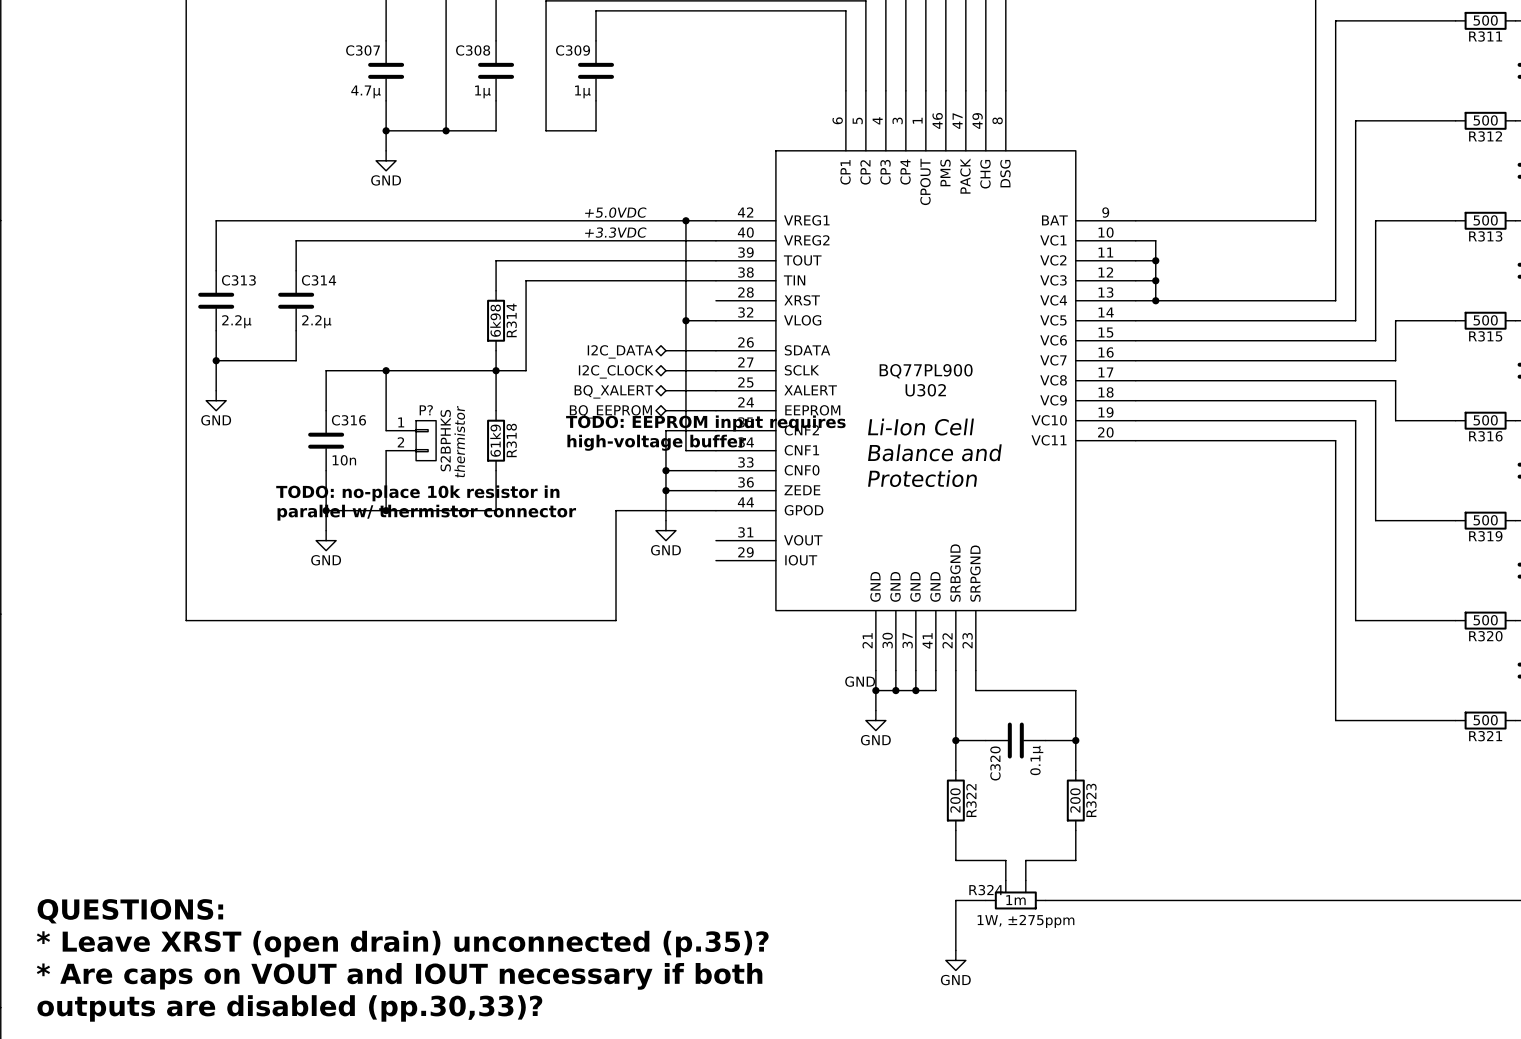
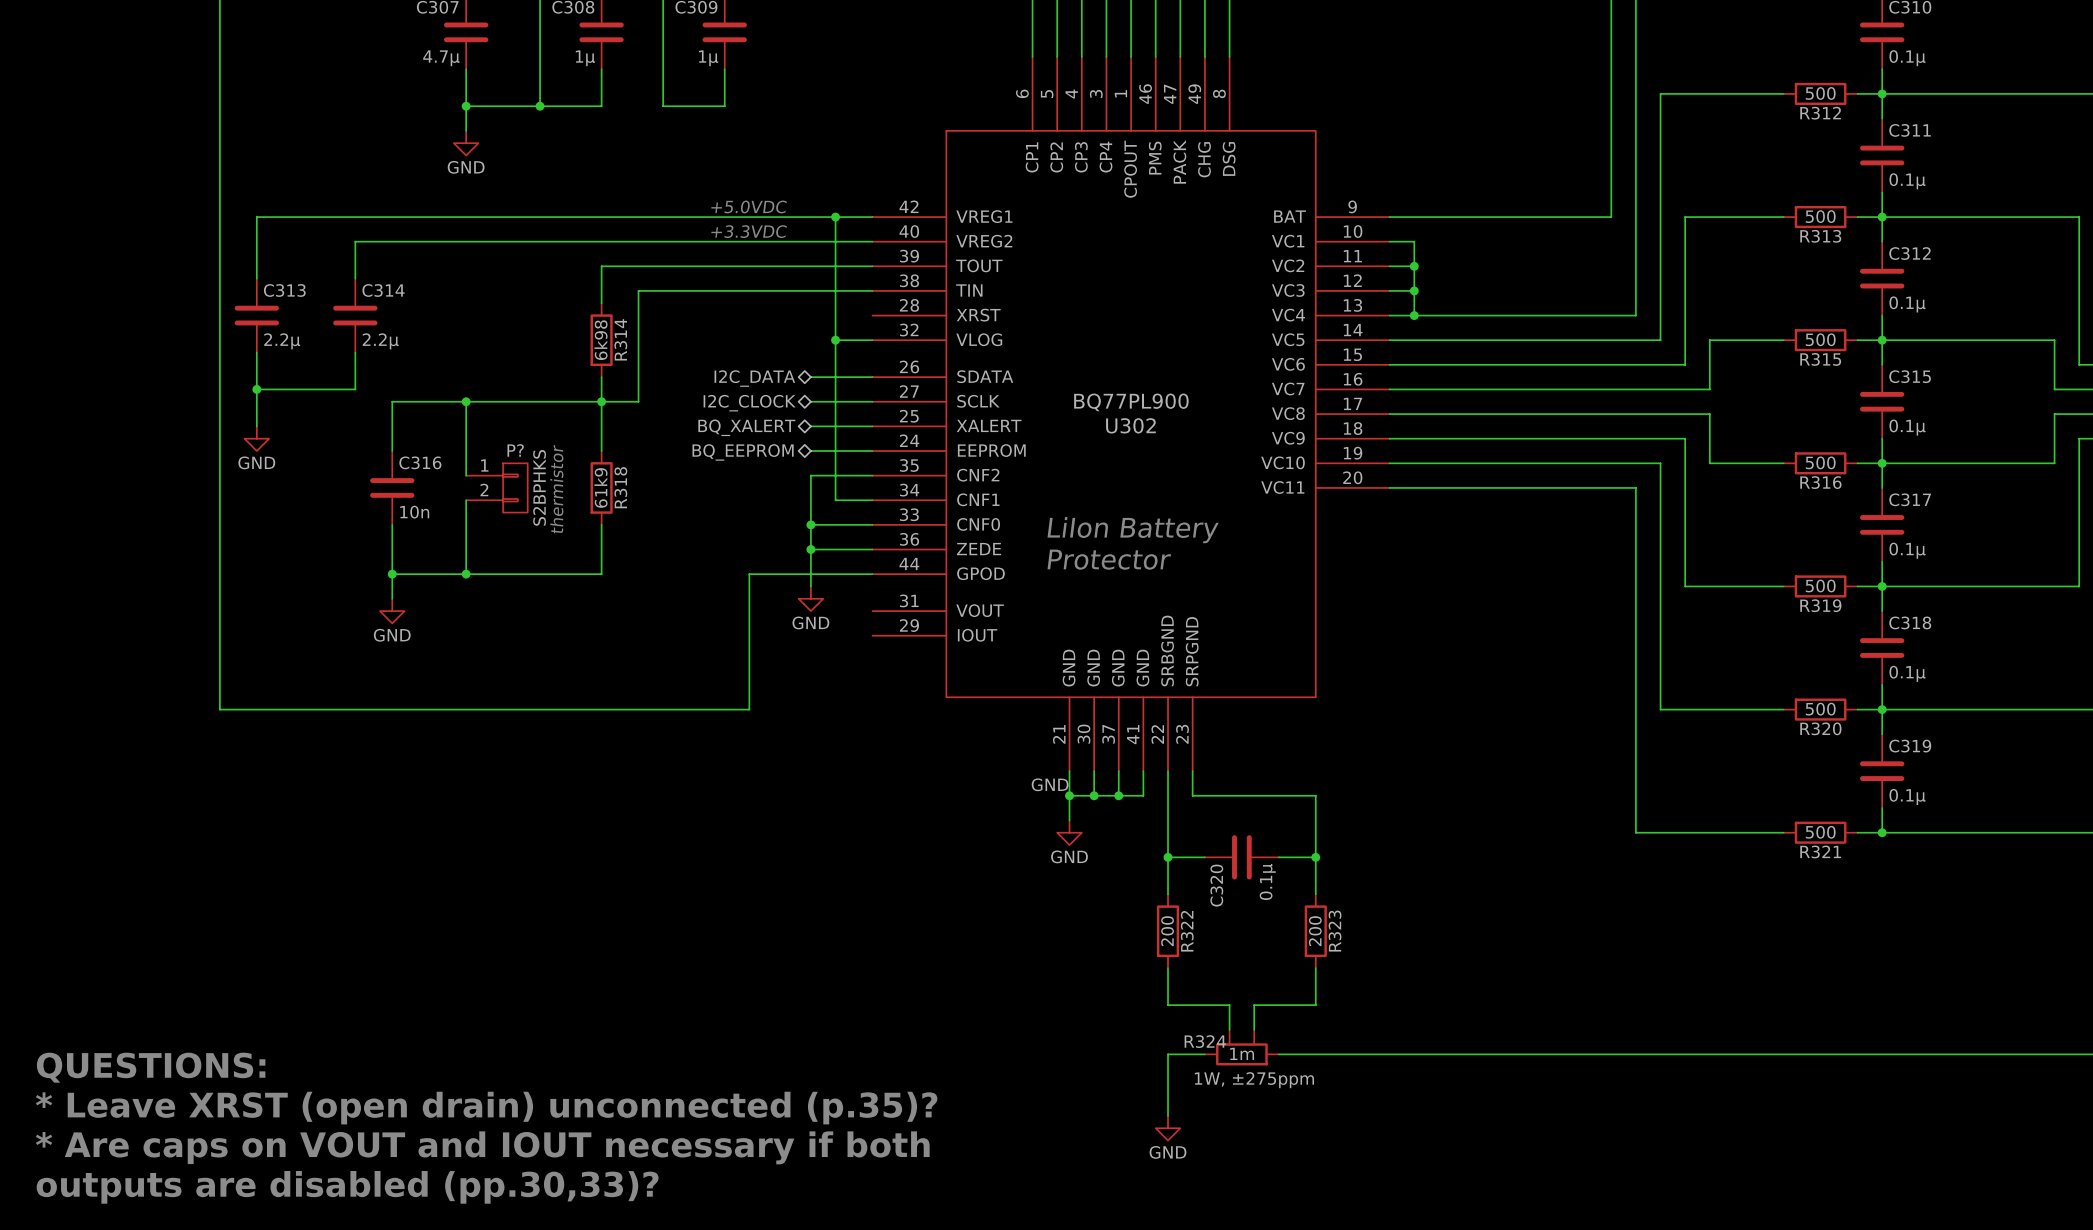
text: TODO: EEPROM input requires (705, 423) -> none
text: Li-Ion Cell (920, 427) -> none
text: high-voltage buffer (656, 442) -> none
text: Balance and (934, 452) -> none
text: none -> LiIon Battery (1133, 530)
text: Protection (922, 478) -> Protector (1109, 559)
text: TODO: no-place 10k resistor in (417, 493) -> none
text: parallel w/ thermistor connector (426, 512) -> none

